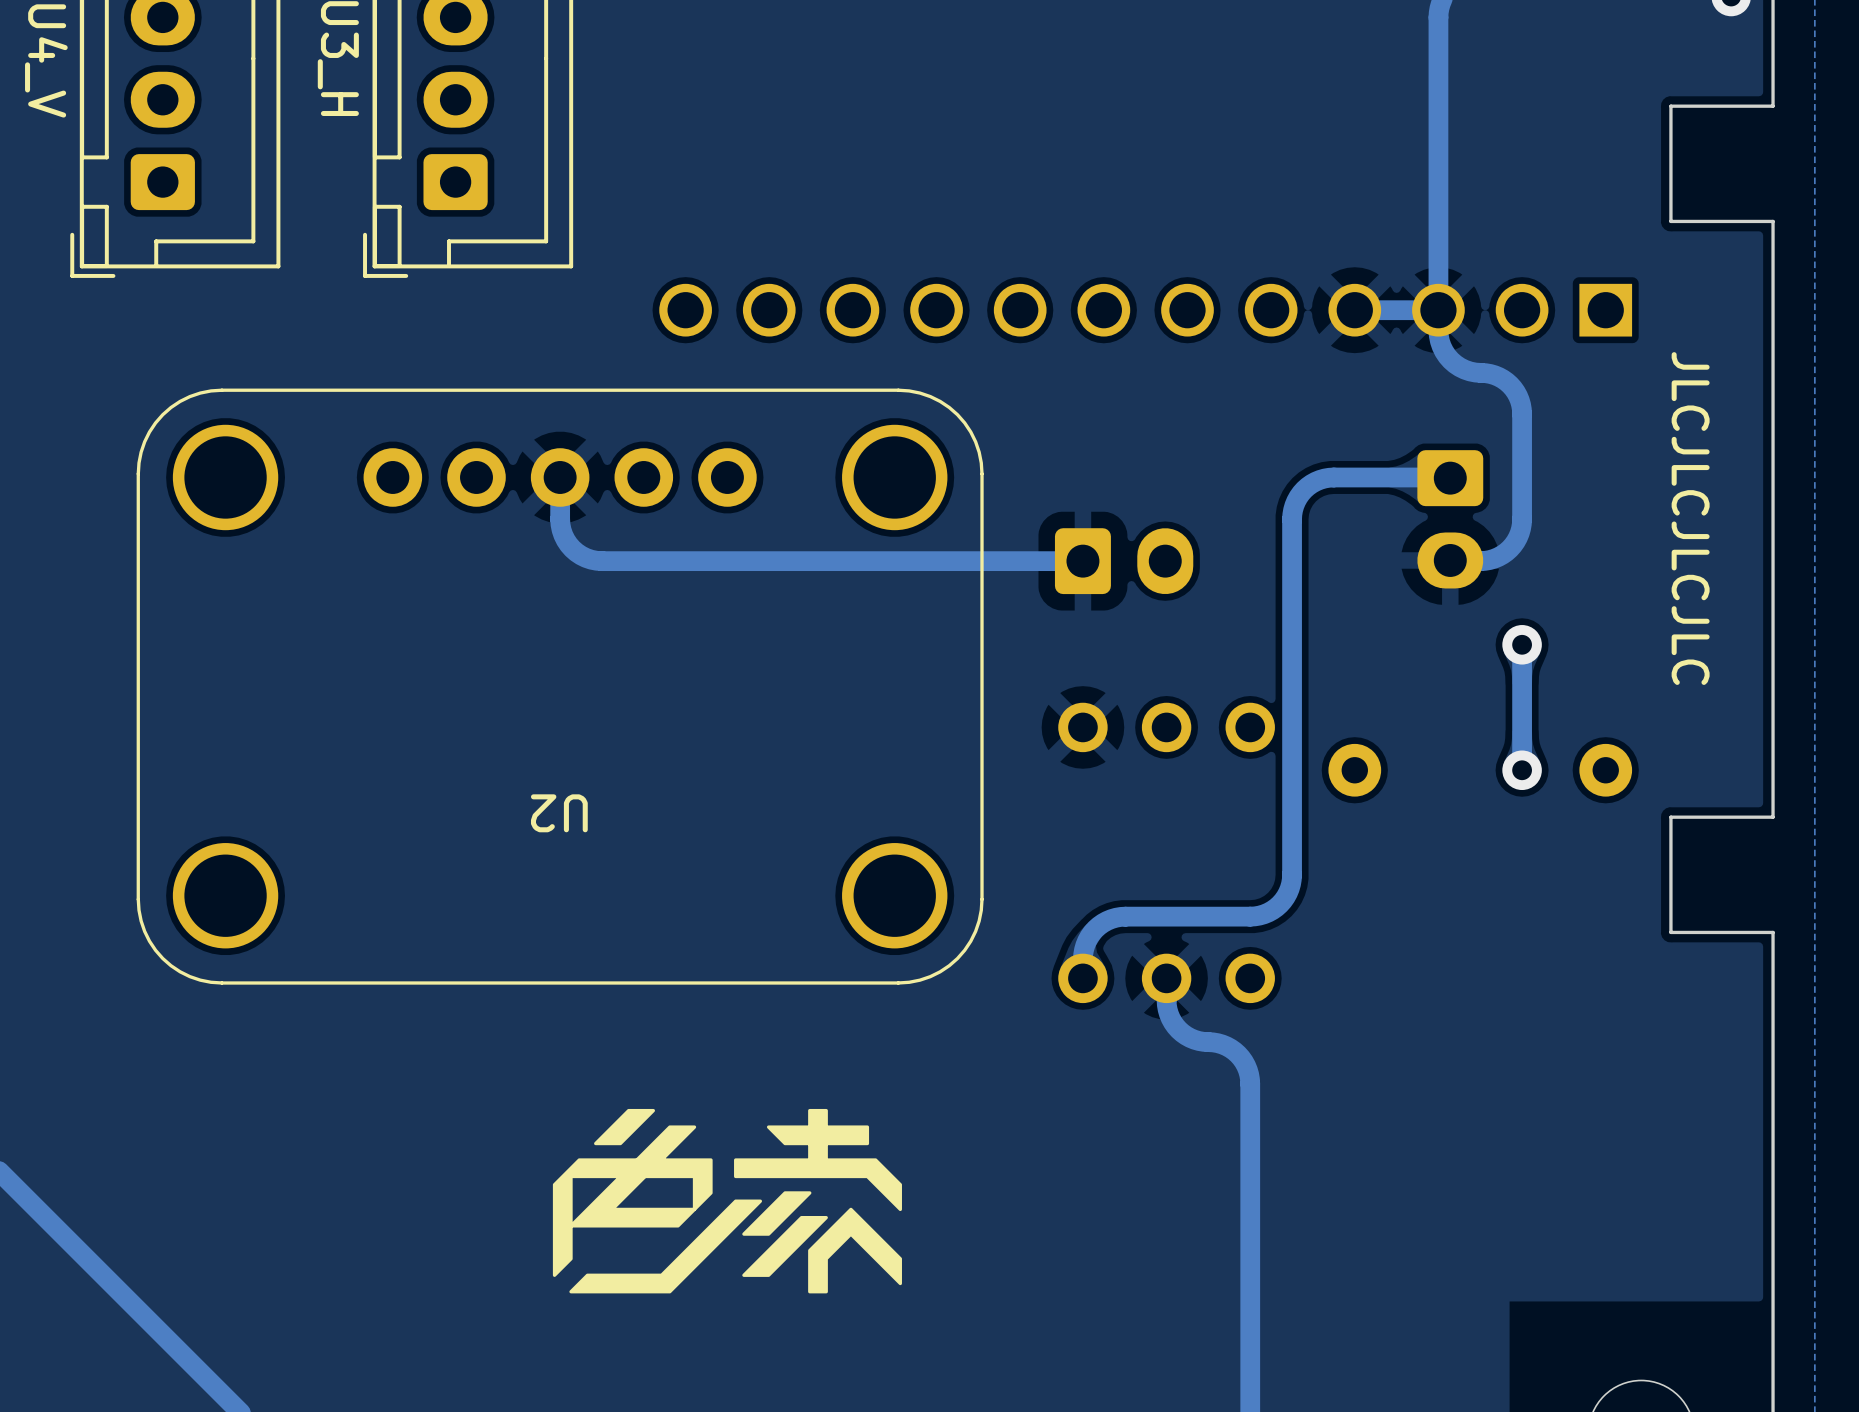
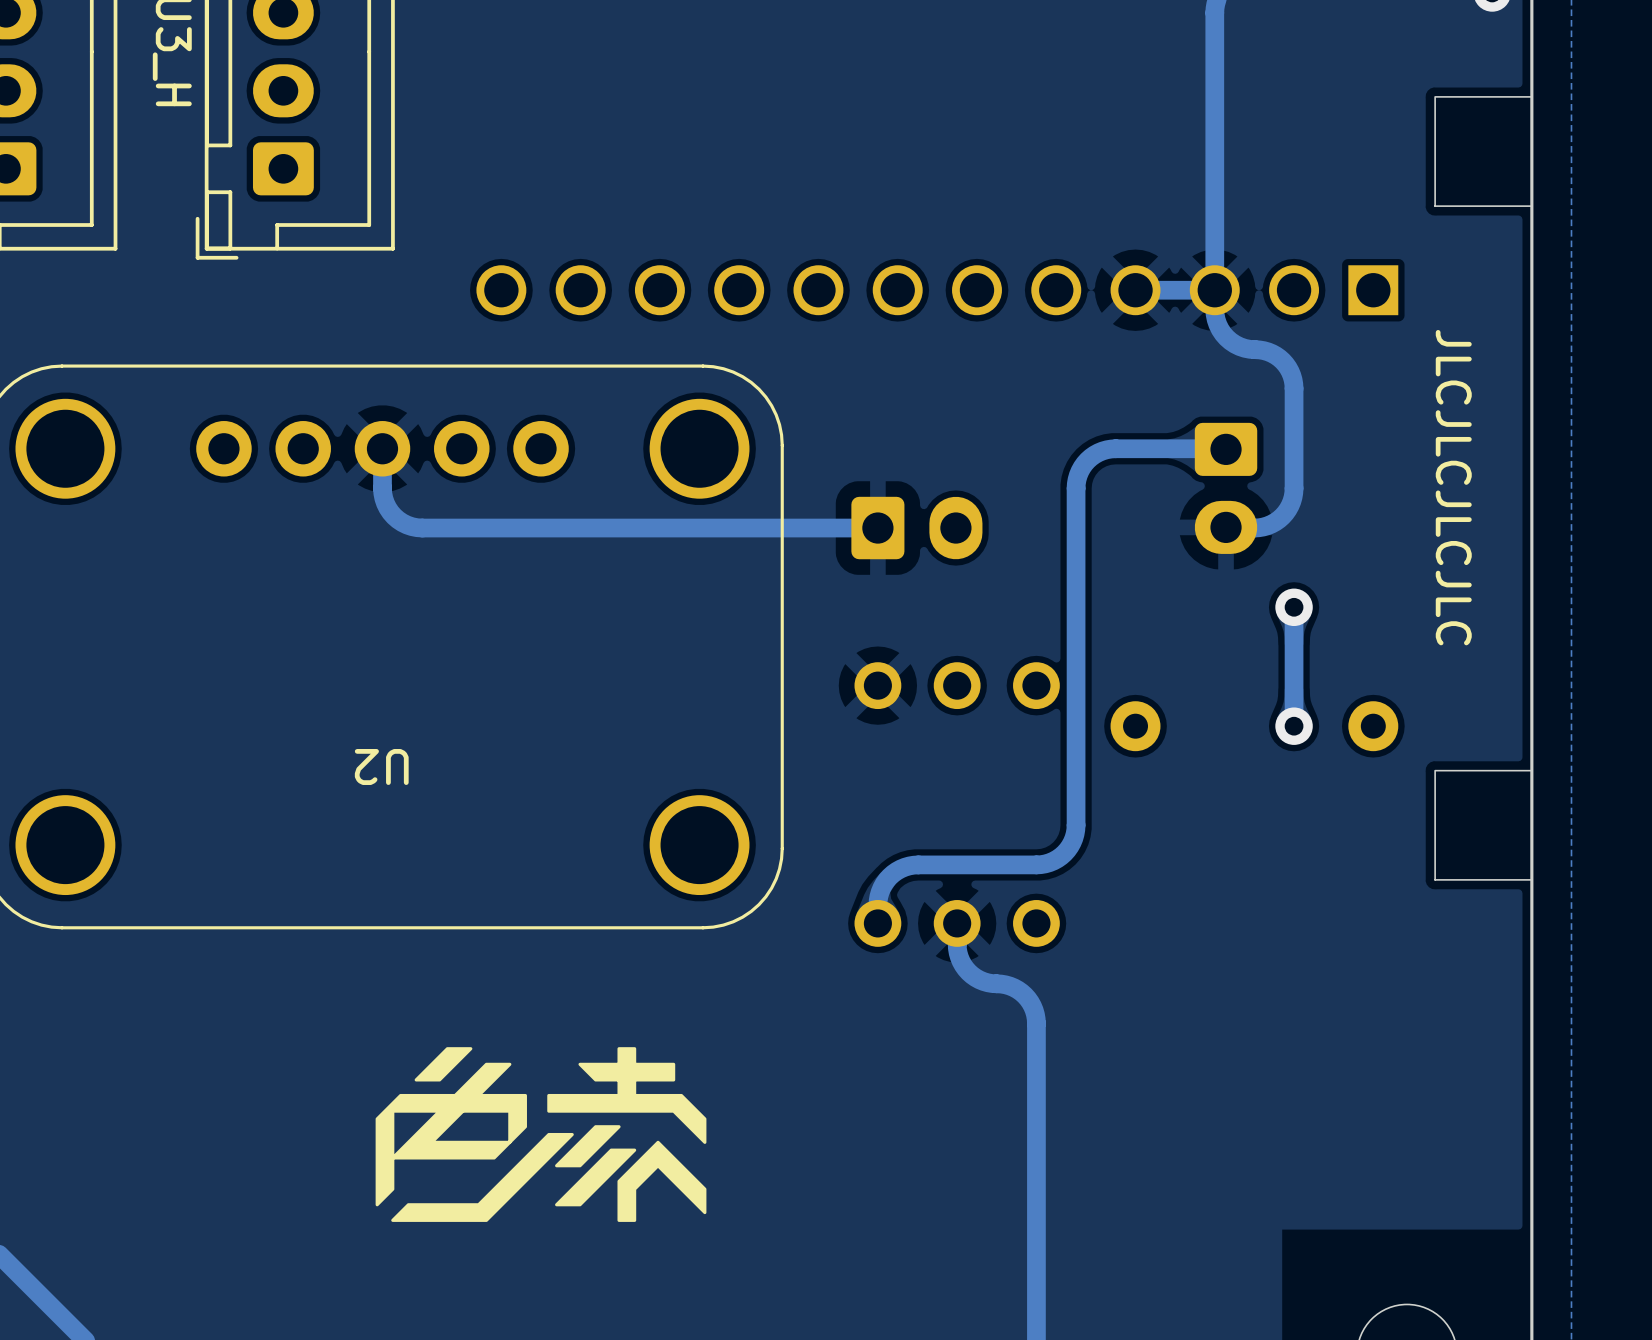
board edge: (1773, 106) (1670, 106) (1670, 221) (1773, 221) -> (1531, 96) (1531, 206)
part: none -> (1483, 151)
board edge: (1773, 817) (1670, 817) (1670, 932) (1773, 932) -> (1531, 770) (1531, 879)
part: none -> (1483, 825)

